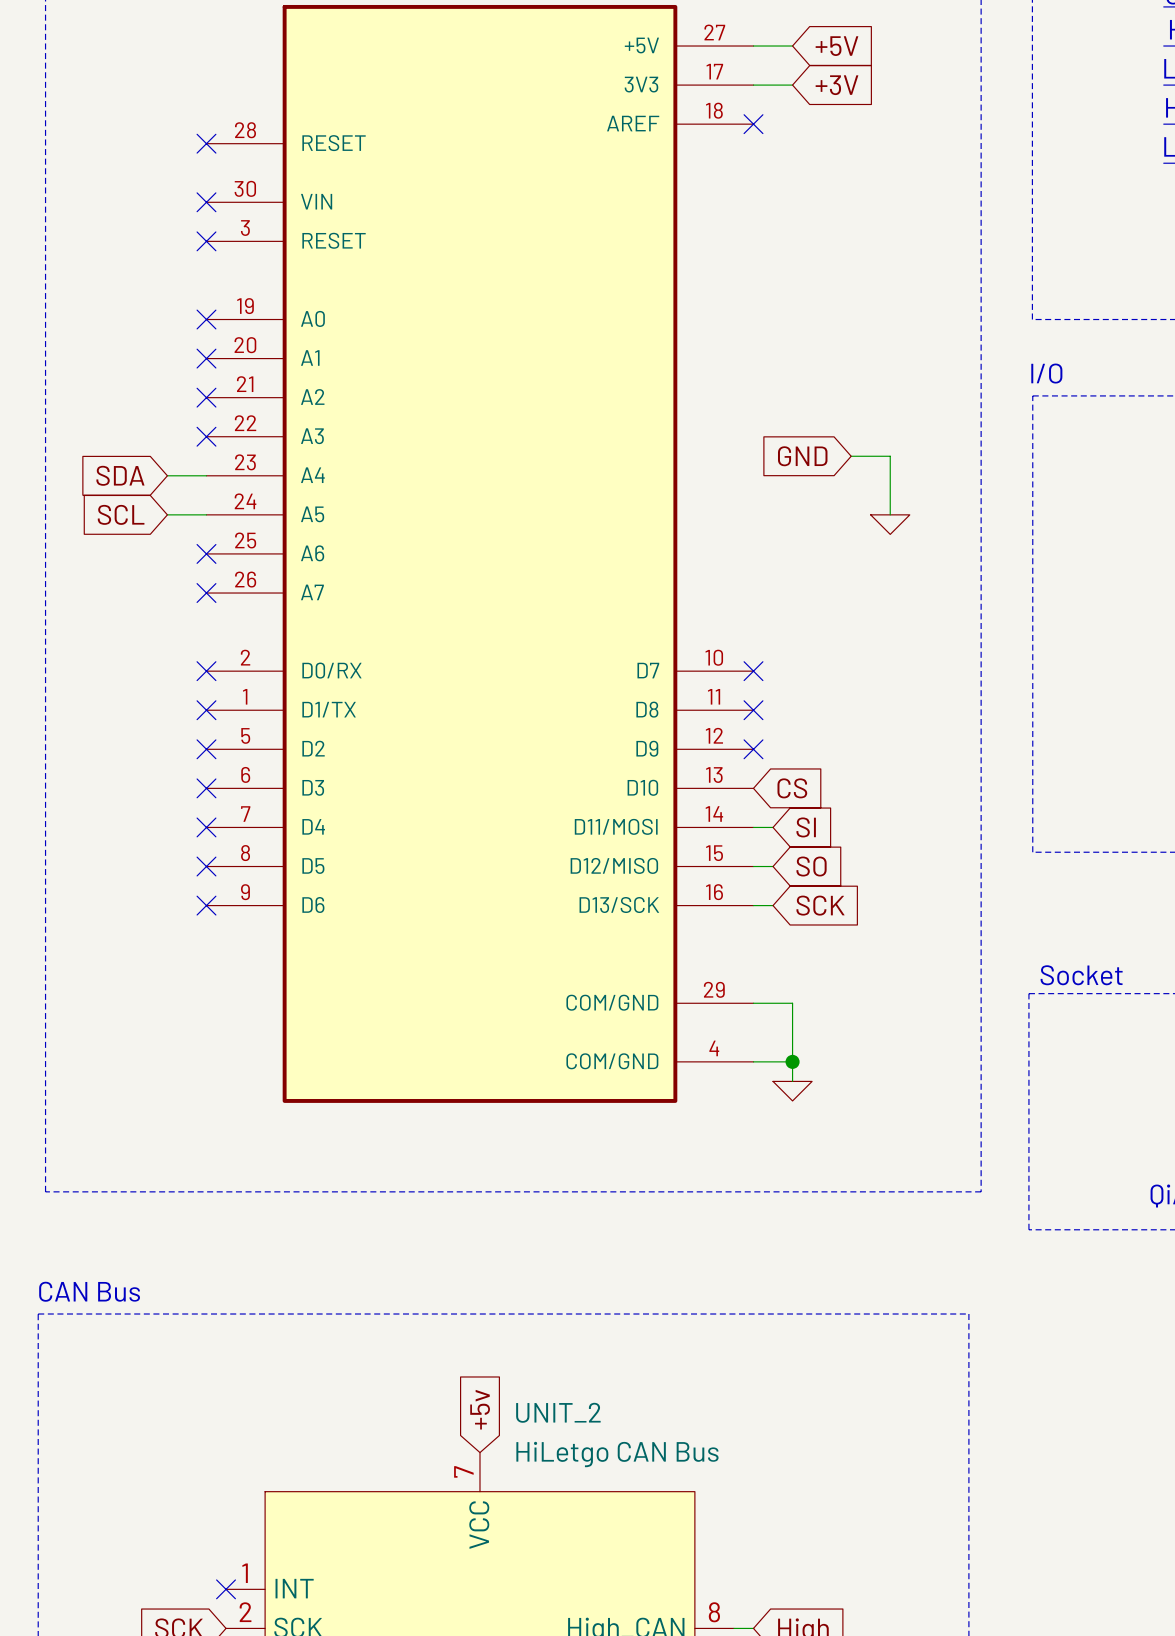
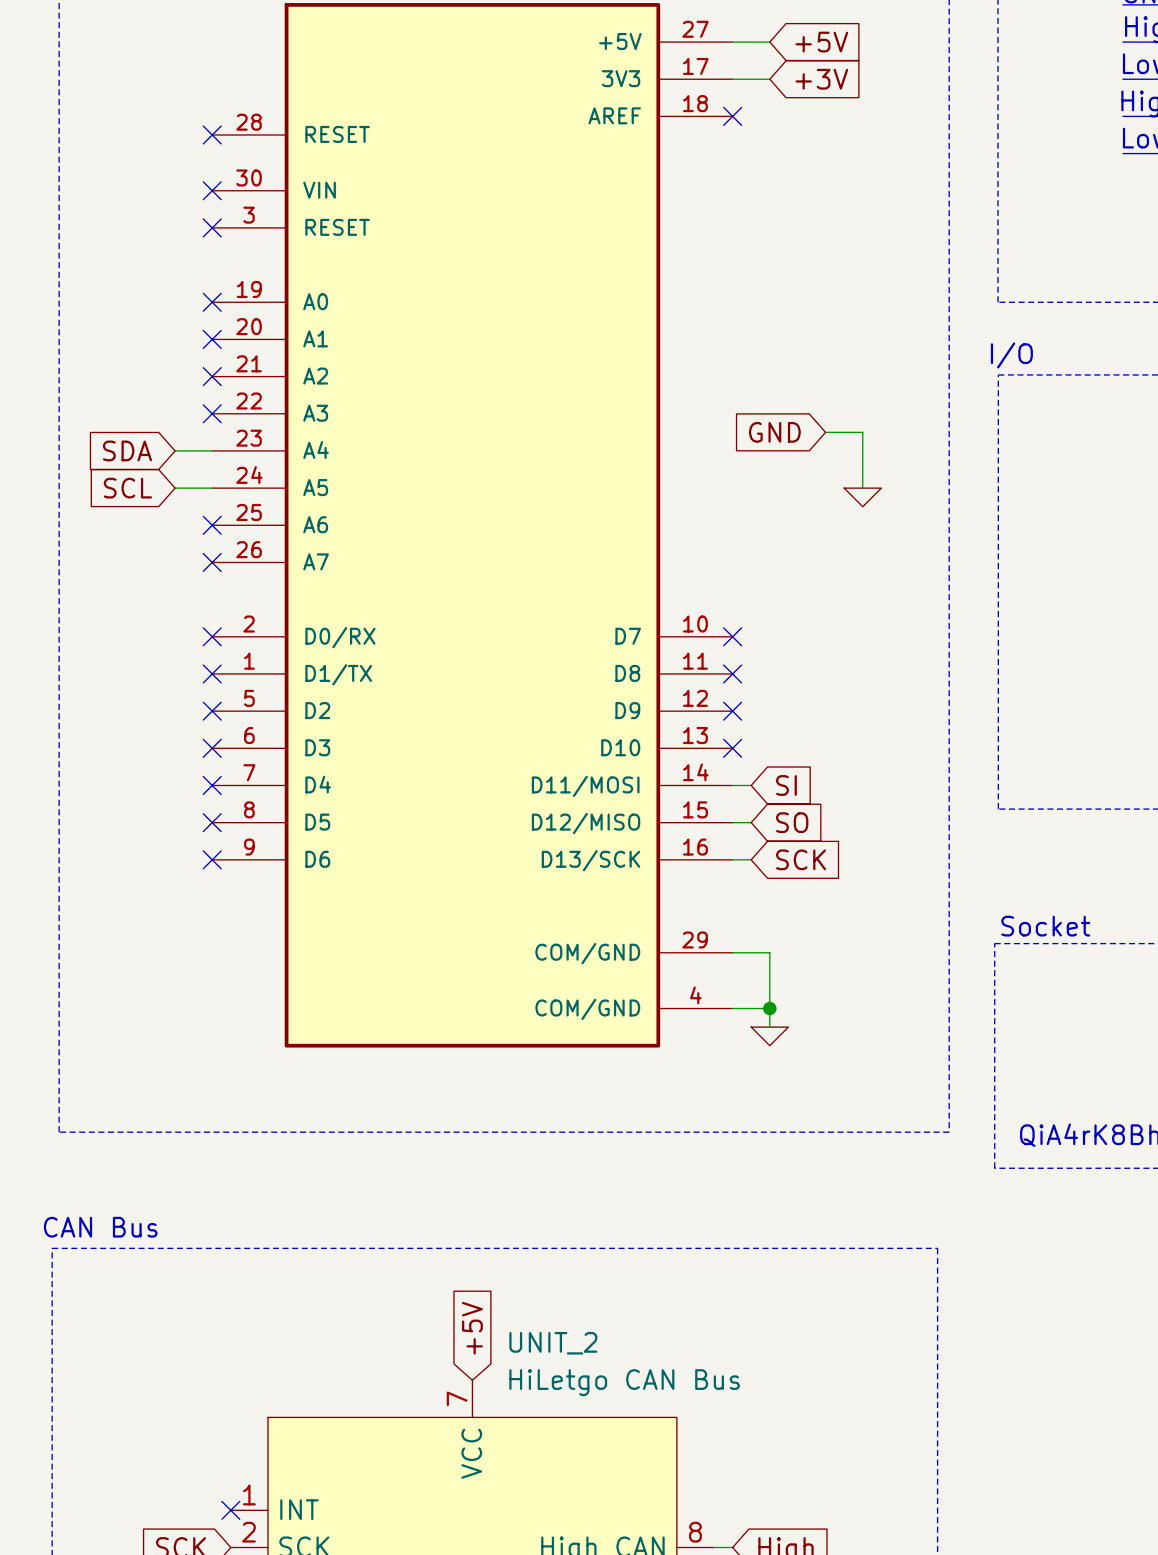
no-connect mark: none -> (732, 748)
global label: CS (792, 788) -> none
global label: +5v (480, 1409) -> +5V (472, 1328)

